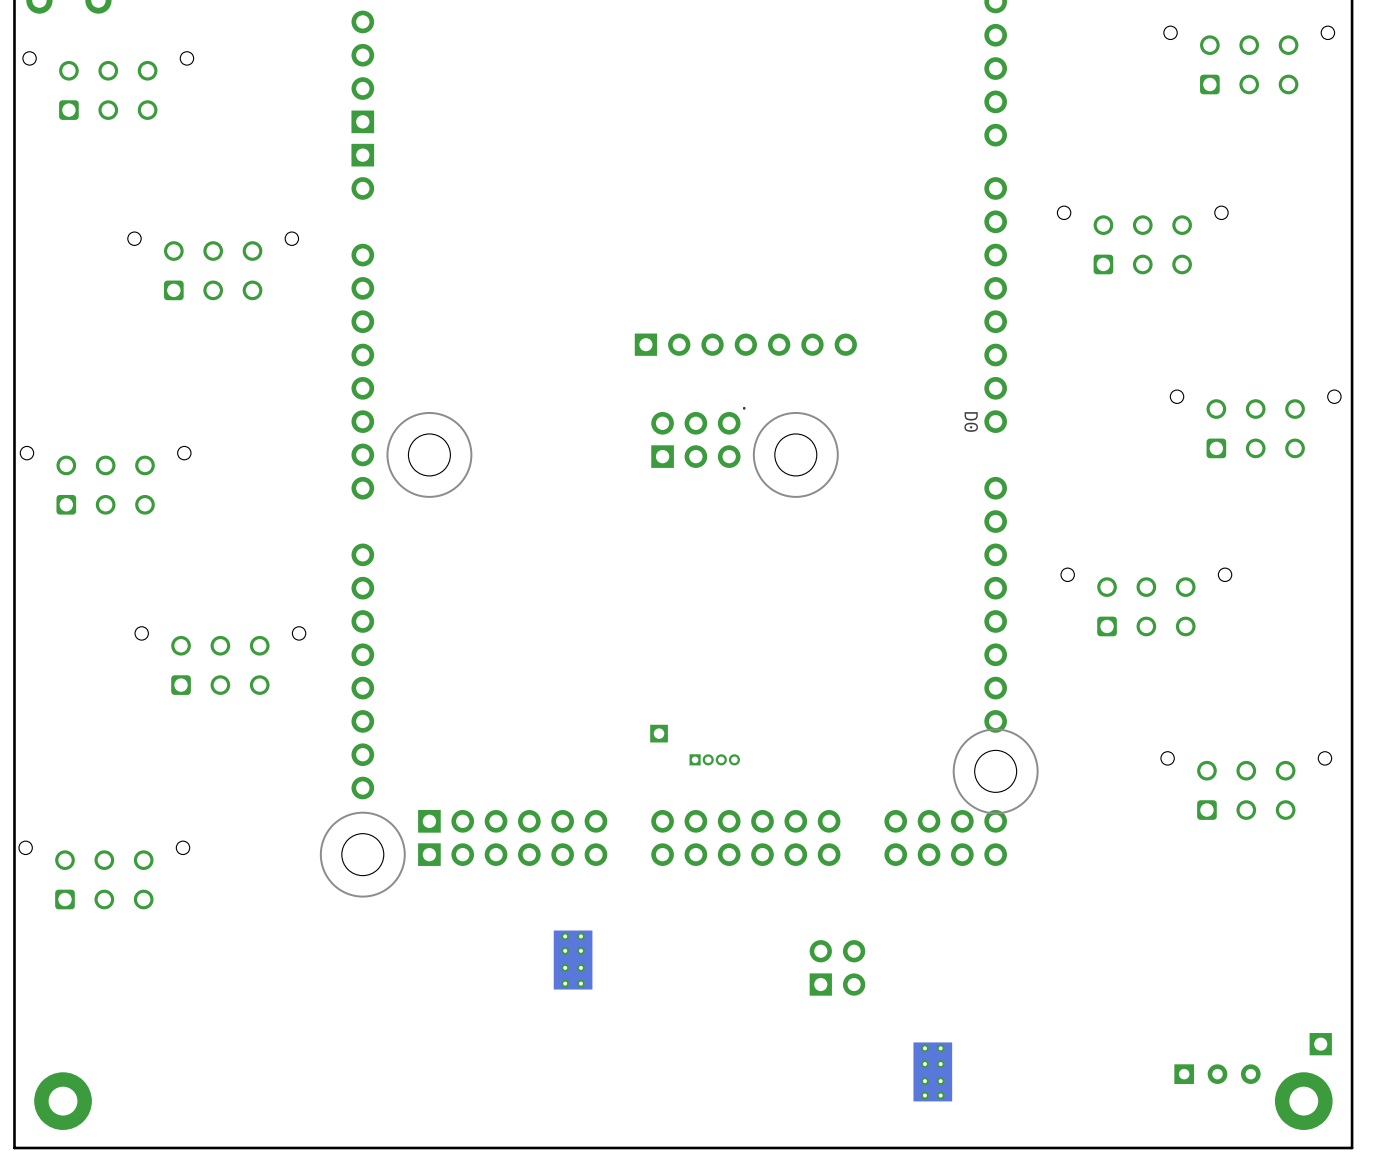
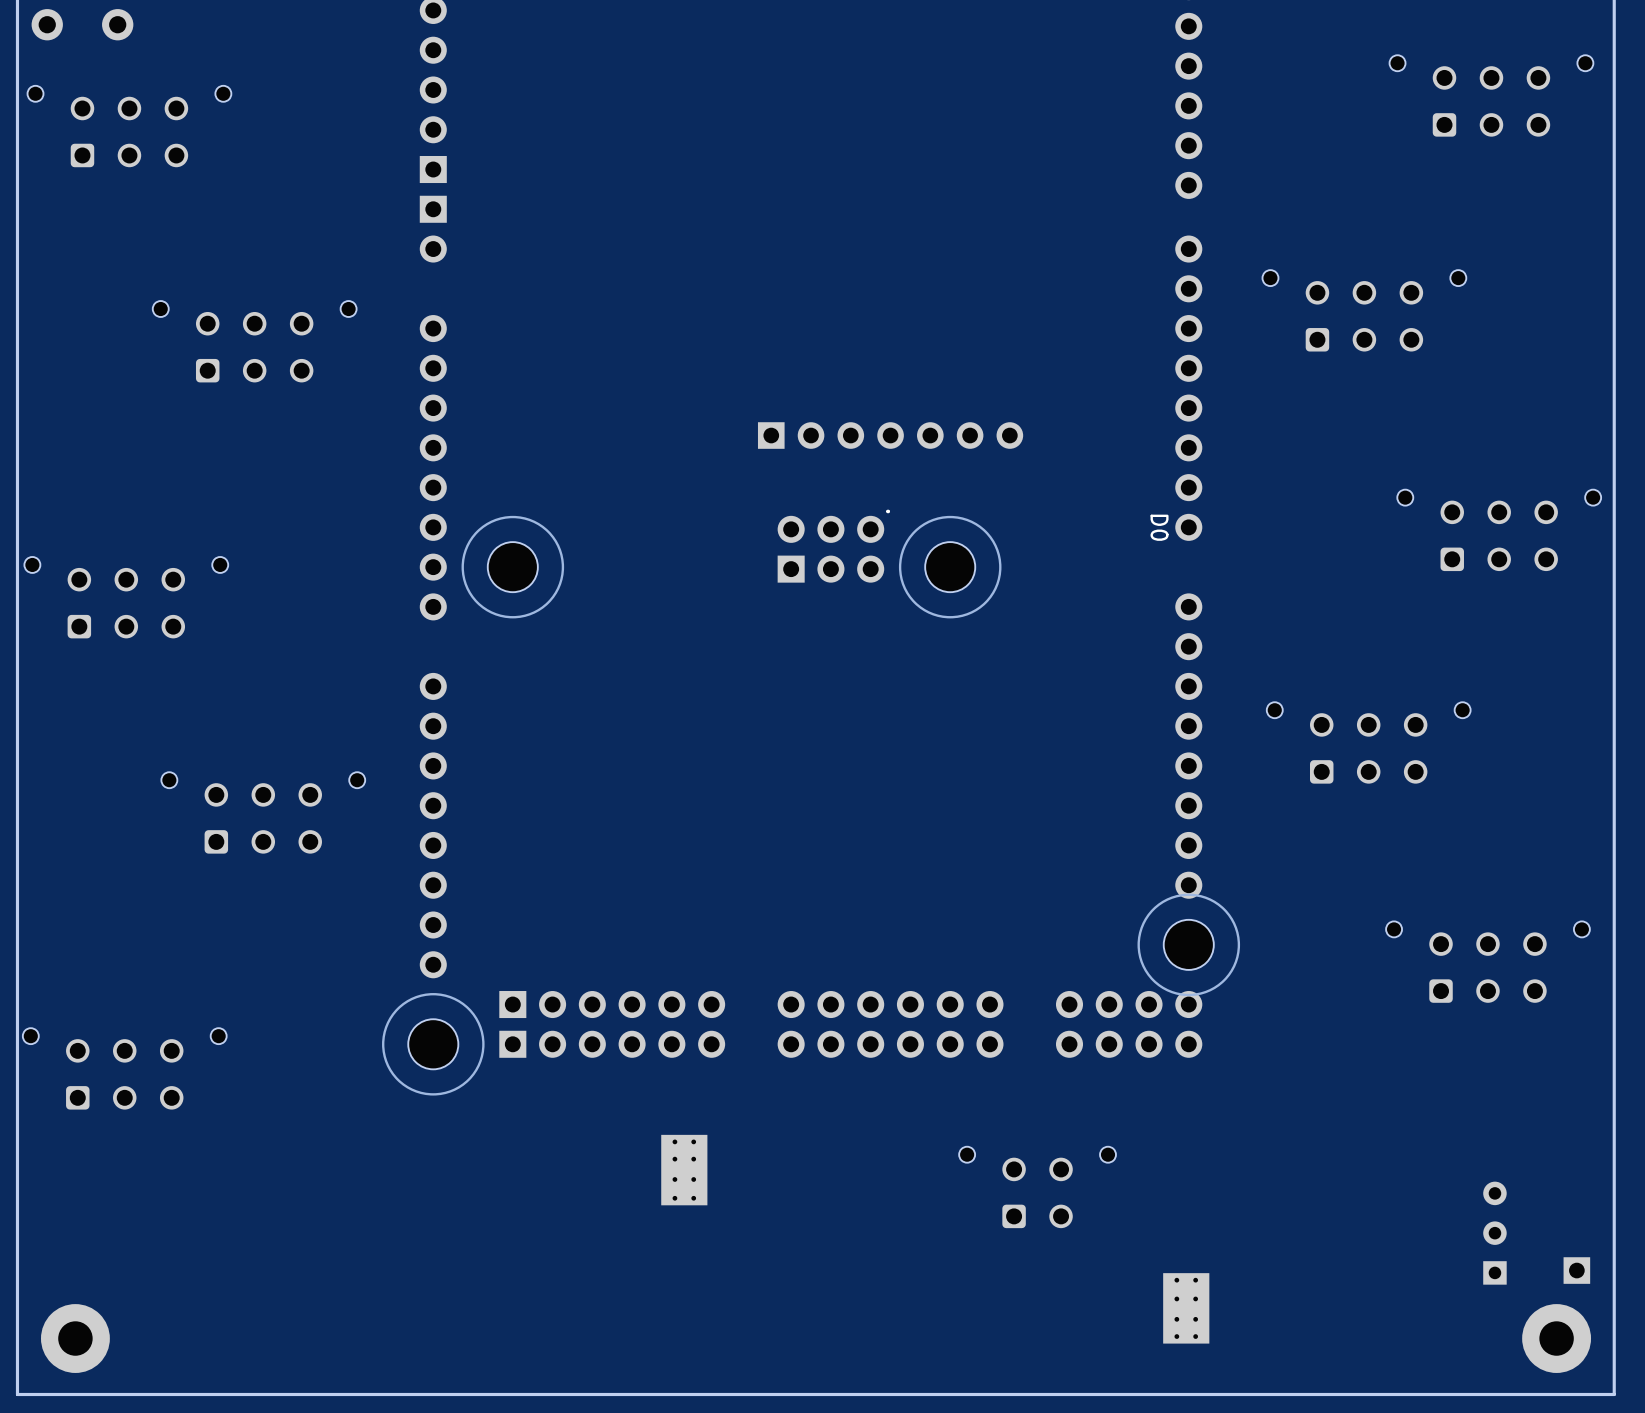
part: (659, 733) -> none
part: (714, 759) -> none
part: (837, 967) -> none
part: none -> (1037, 1187)
part position: (932, 1071) -> (1186, 1308)
part rotation: 0° (1217, 1074) -> 90° counterclockwise (1494, 1233)
part position: (1217, 1074) -> (1494, 1233)

